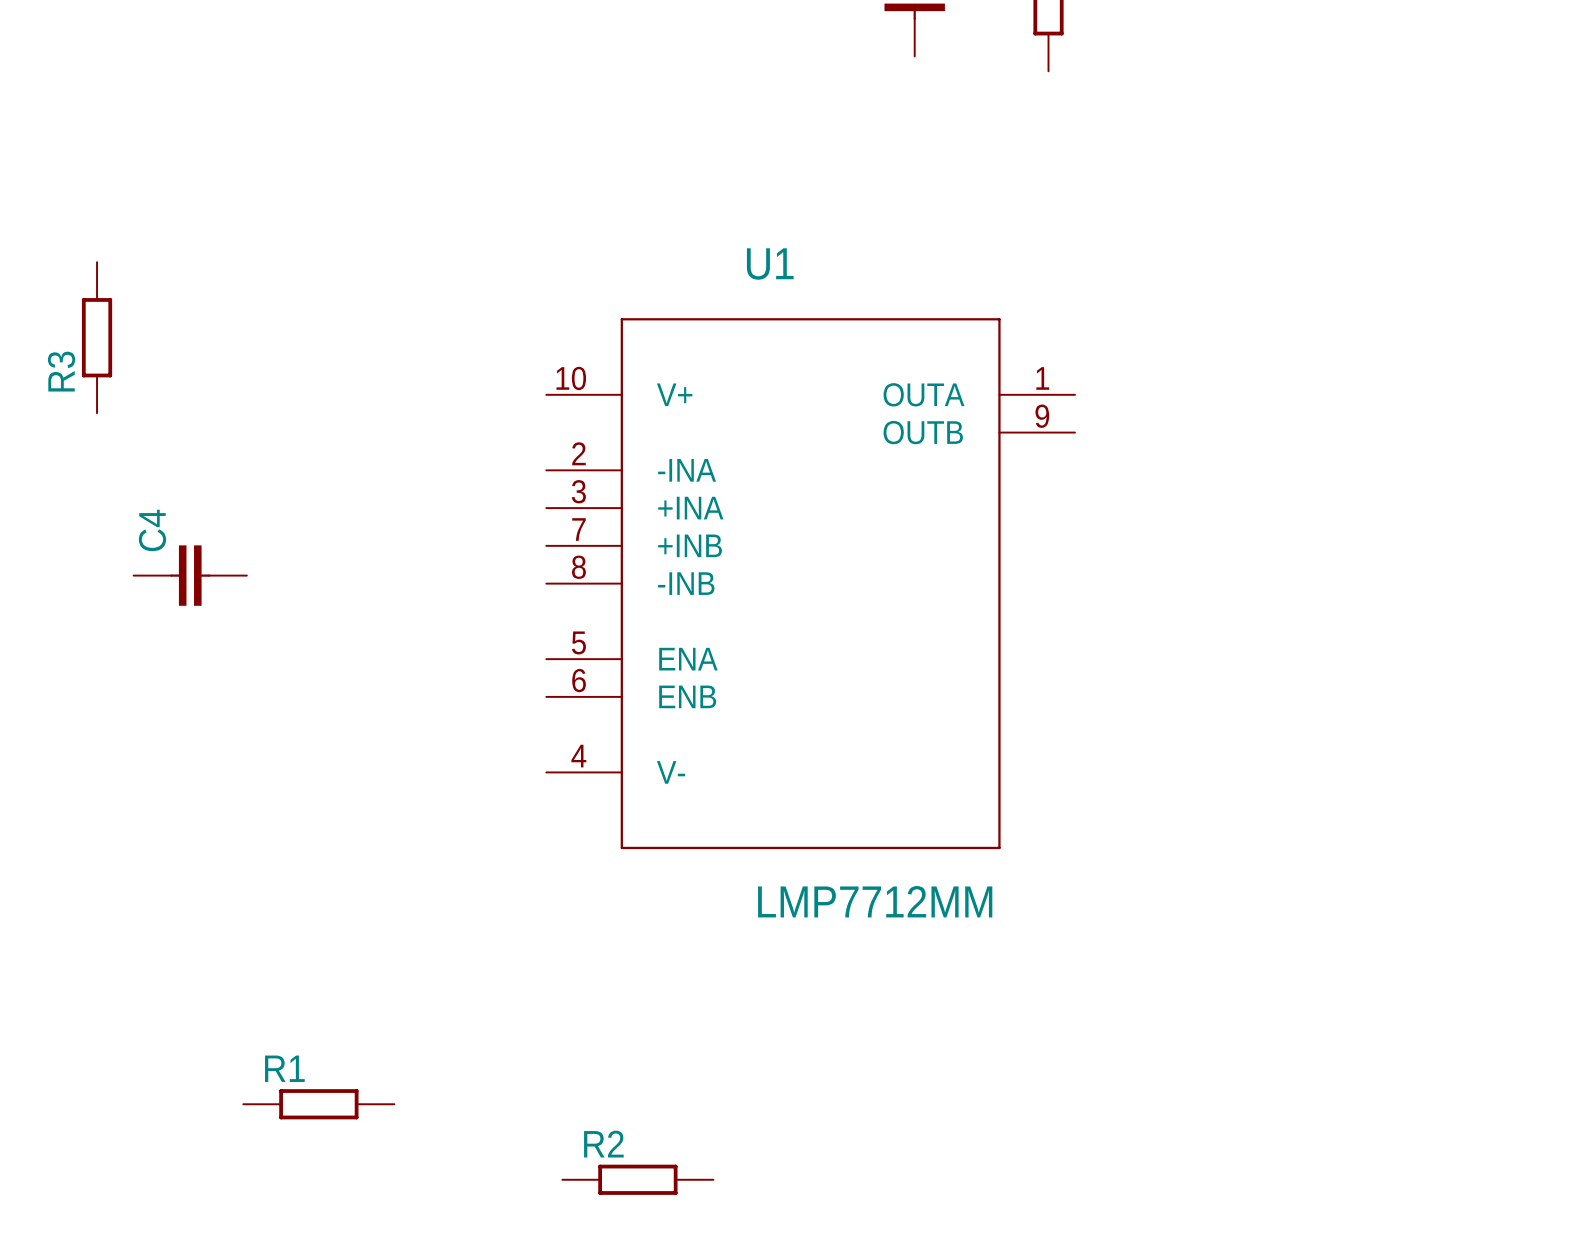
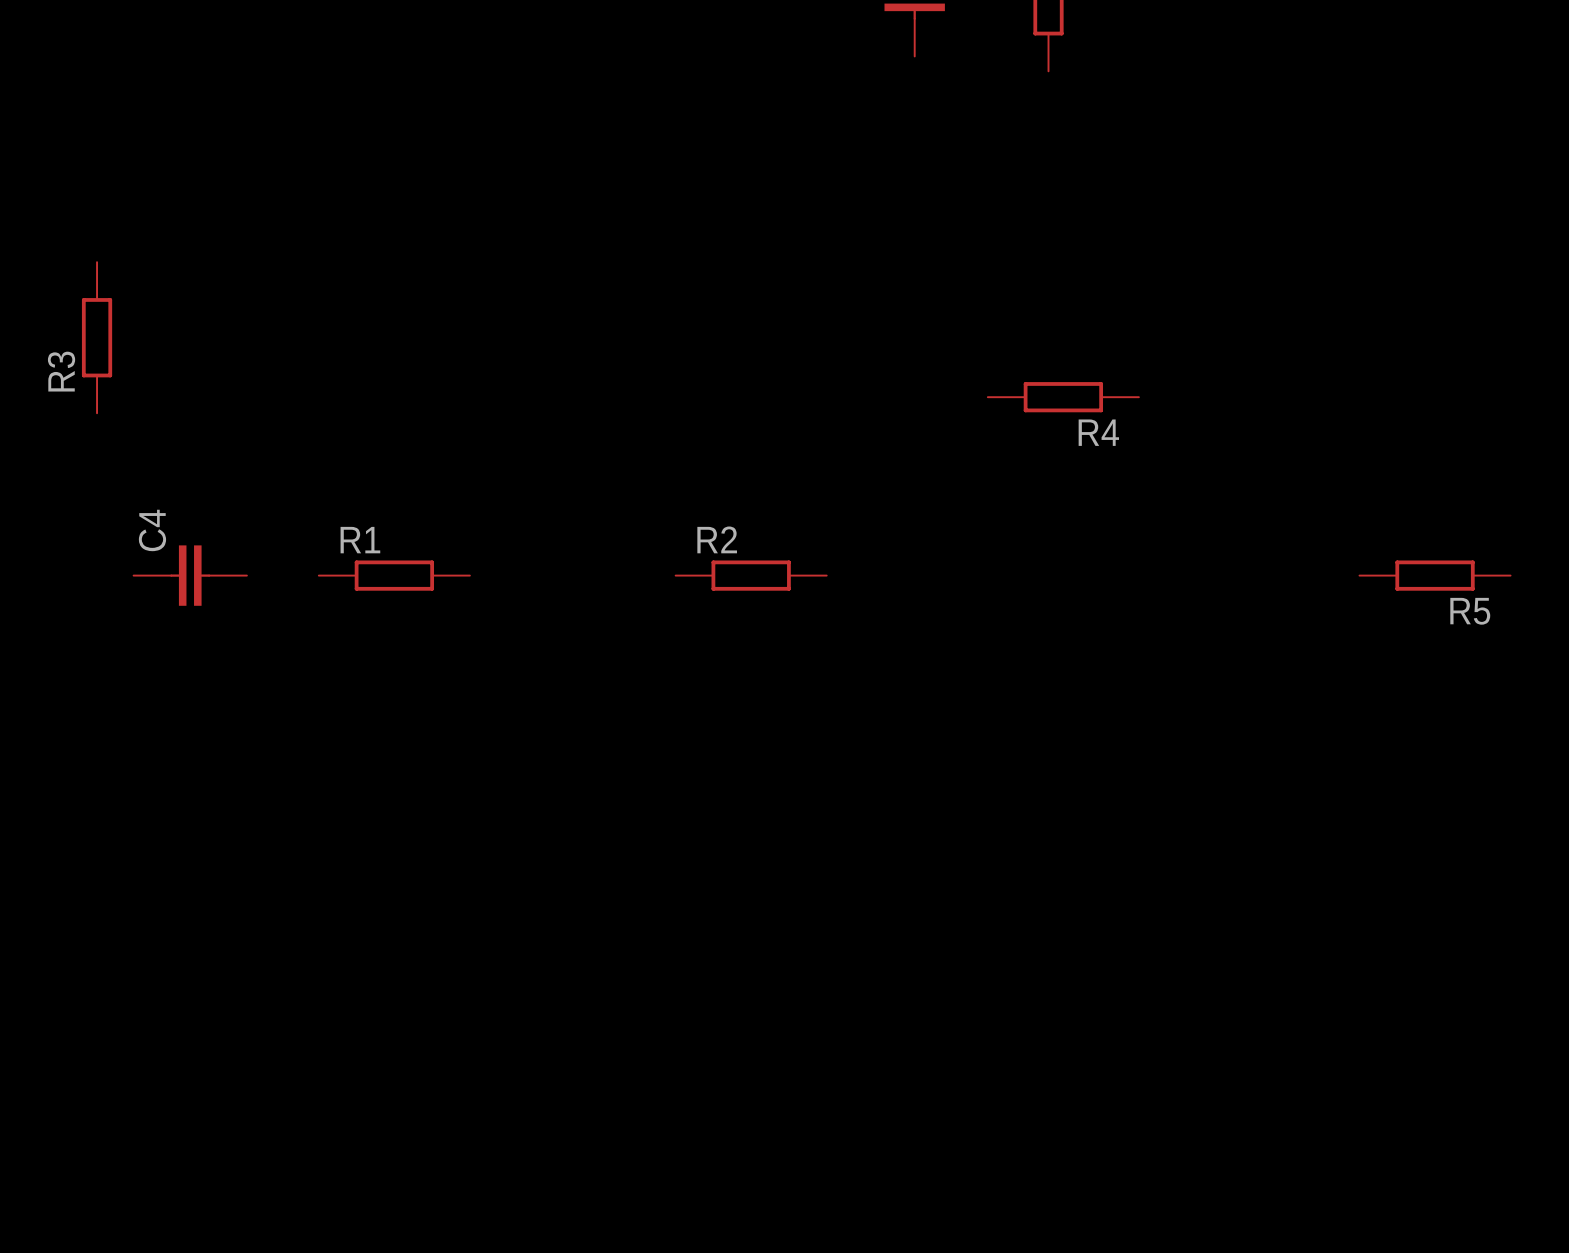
R4: none -> (1063, 397)
R5: none -> (1435, 575)
U1: LMP7712MM (810, 583) -> none
R1 position: (318, 1104) -> (394, 575)
R2 position: (637, 1179) -> (751, 575)

